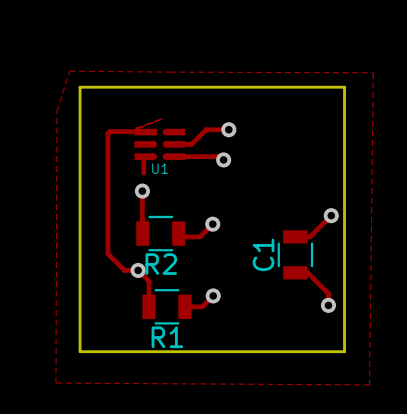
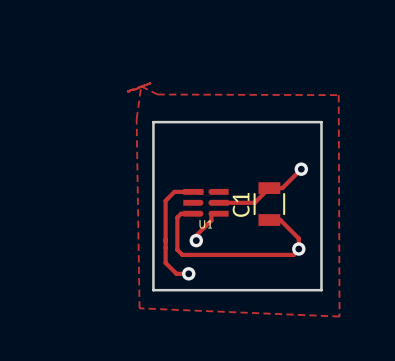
zone outline: (69, 71) (56, 111) (55, 383) (369, 384) (373, 72) (69, 71) -> (141, 86) (136, 119) (139, 308) (339, 316) (338, 95) (157, 94) (141, 86)
track: (228, 129) (206, 129) (191, 144) (166, 144) -> none
via: (228, 129) -> none
track: (142, 131) (109, 131) (107, 133) (107, 253) (124, 270) (138, 270) (149, 281) (149, 297) -> none
U1 position: (159, 144) -> (205, 202)
track: (153, 156) (142, 156) (143, 173) -> none
track: (166, 156) (220, 156) (223, 159) -> none
via: (223, 159) -> none
track: (142, 191) (142, 224) -> none
via: (142, 191) -> none
track: (212, 224) (200, 236) (182, 236) -> none
via: (212, 224) -> none
R2: (160, 233) -> none
track: none -> (267, 189) (254, 202) (211, 202)
track: none -> (200, 191) (174, 191) (165, 200) (165, 262) (176, 273) (188, 273)
track: none -> (200, 213) (181, 213) (177, 217) (177, 249) (182, 254) (293, 254) (298, 249)
track: none -> (211, 213) (211, 220) (194, 237)
via: (138, 270) -> none
track: (213, 295) (202, 306) (184, 306) -> none
R1: (166, 306) -> none
via: none -> (188, 273)
board edge: (165, 351) (80, 351) (80, 87) (344, 87) (344, 351) -> (153, 290) (153, 122) (321, 122) (321, 290) (313, 290)

